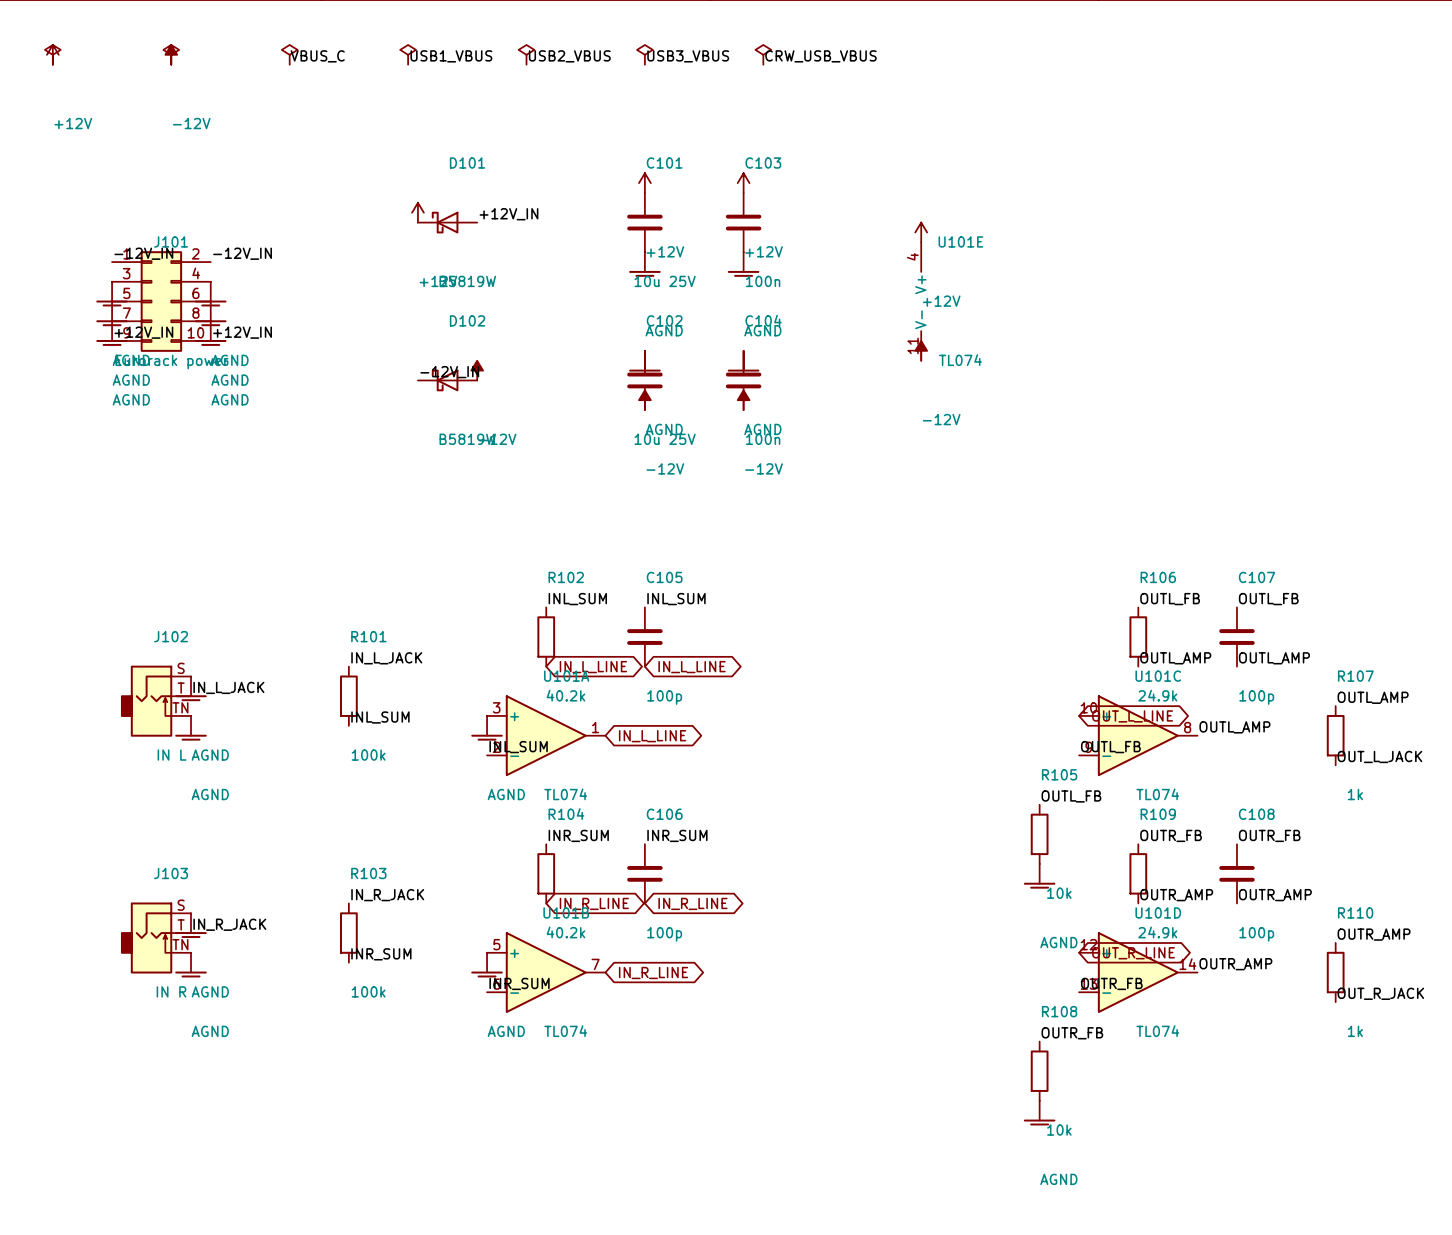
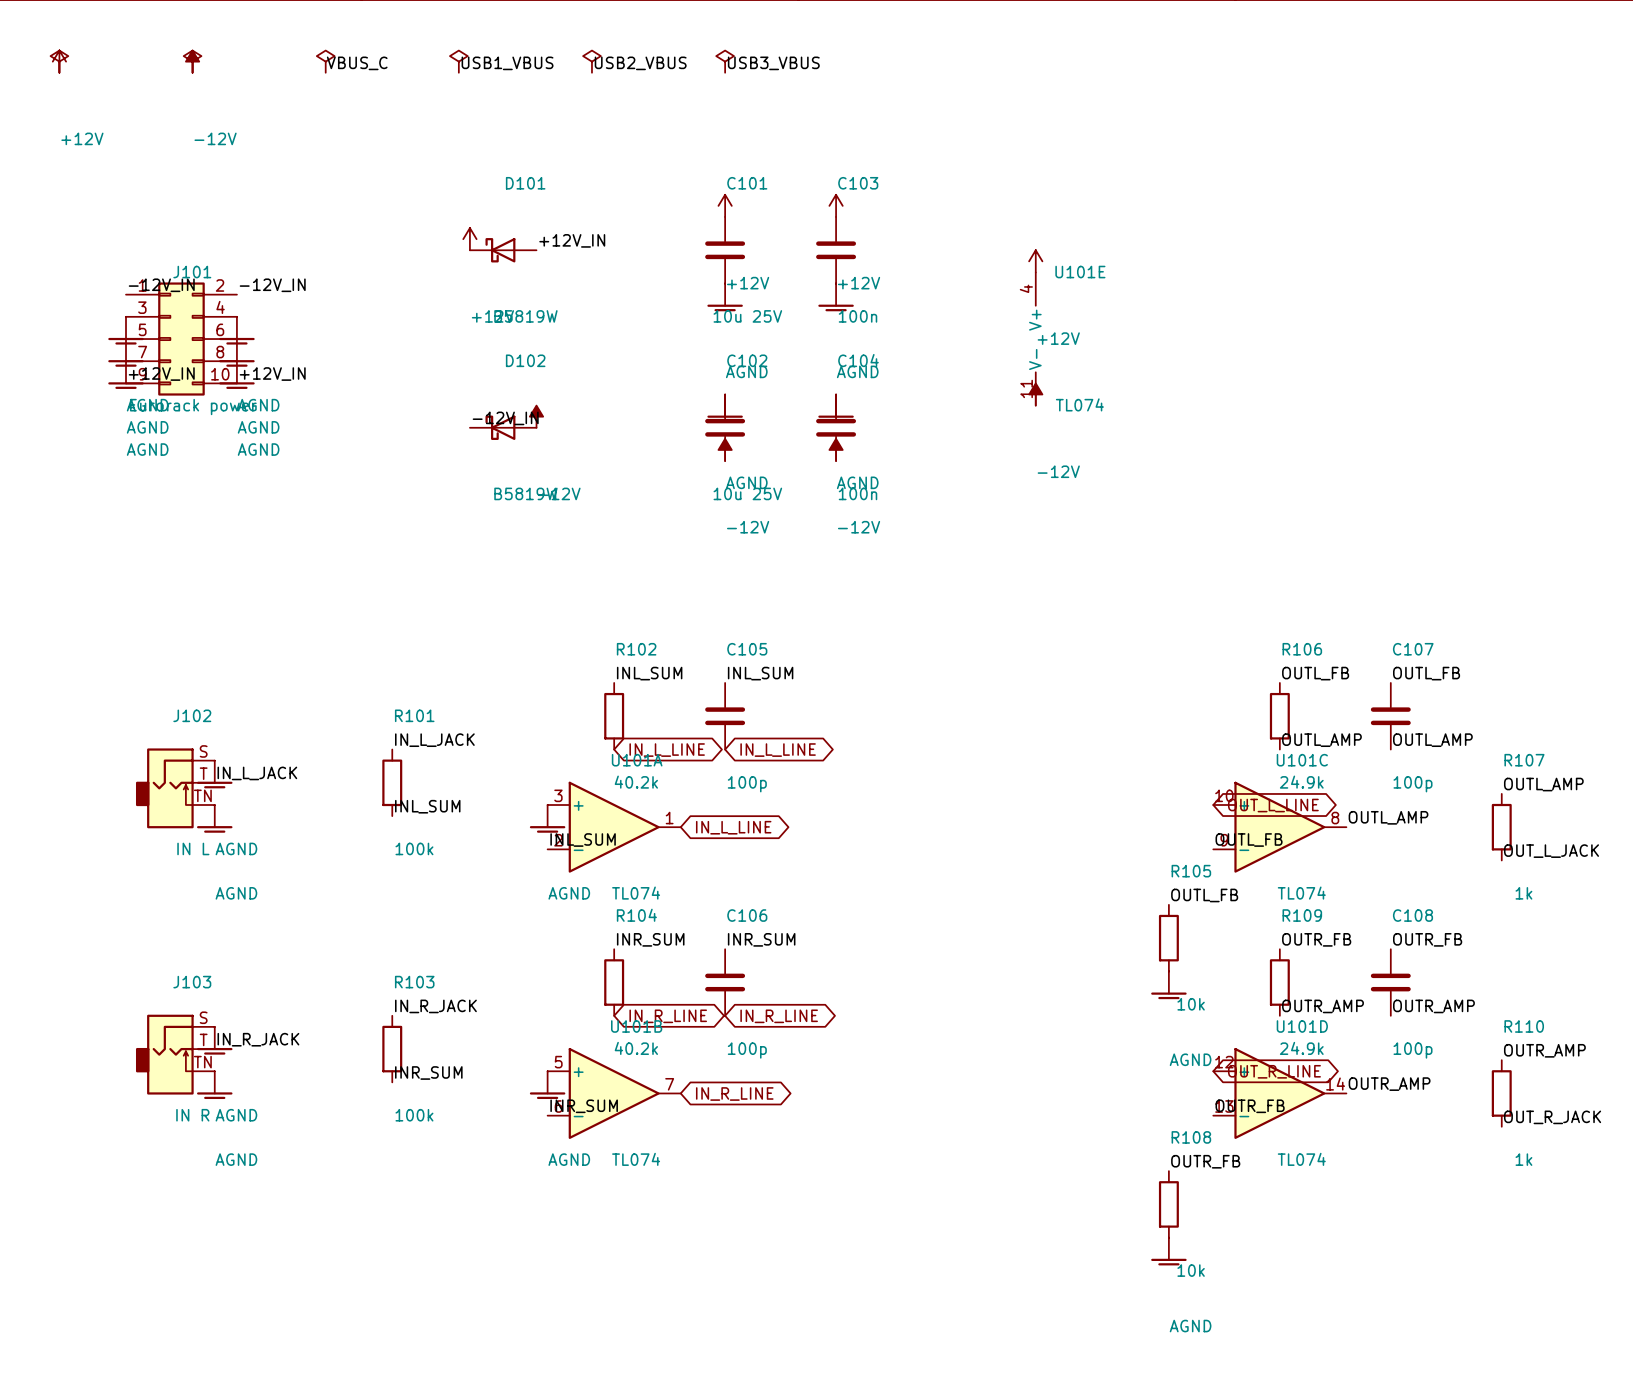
power symbol: (763, 54) -> none
label: CRW_USB_VBUS (820, 56) -> none

